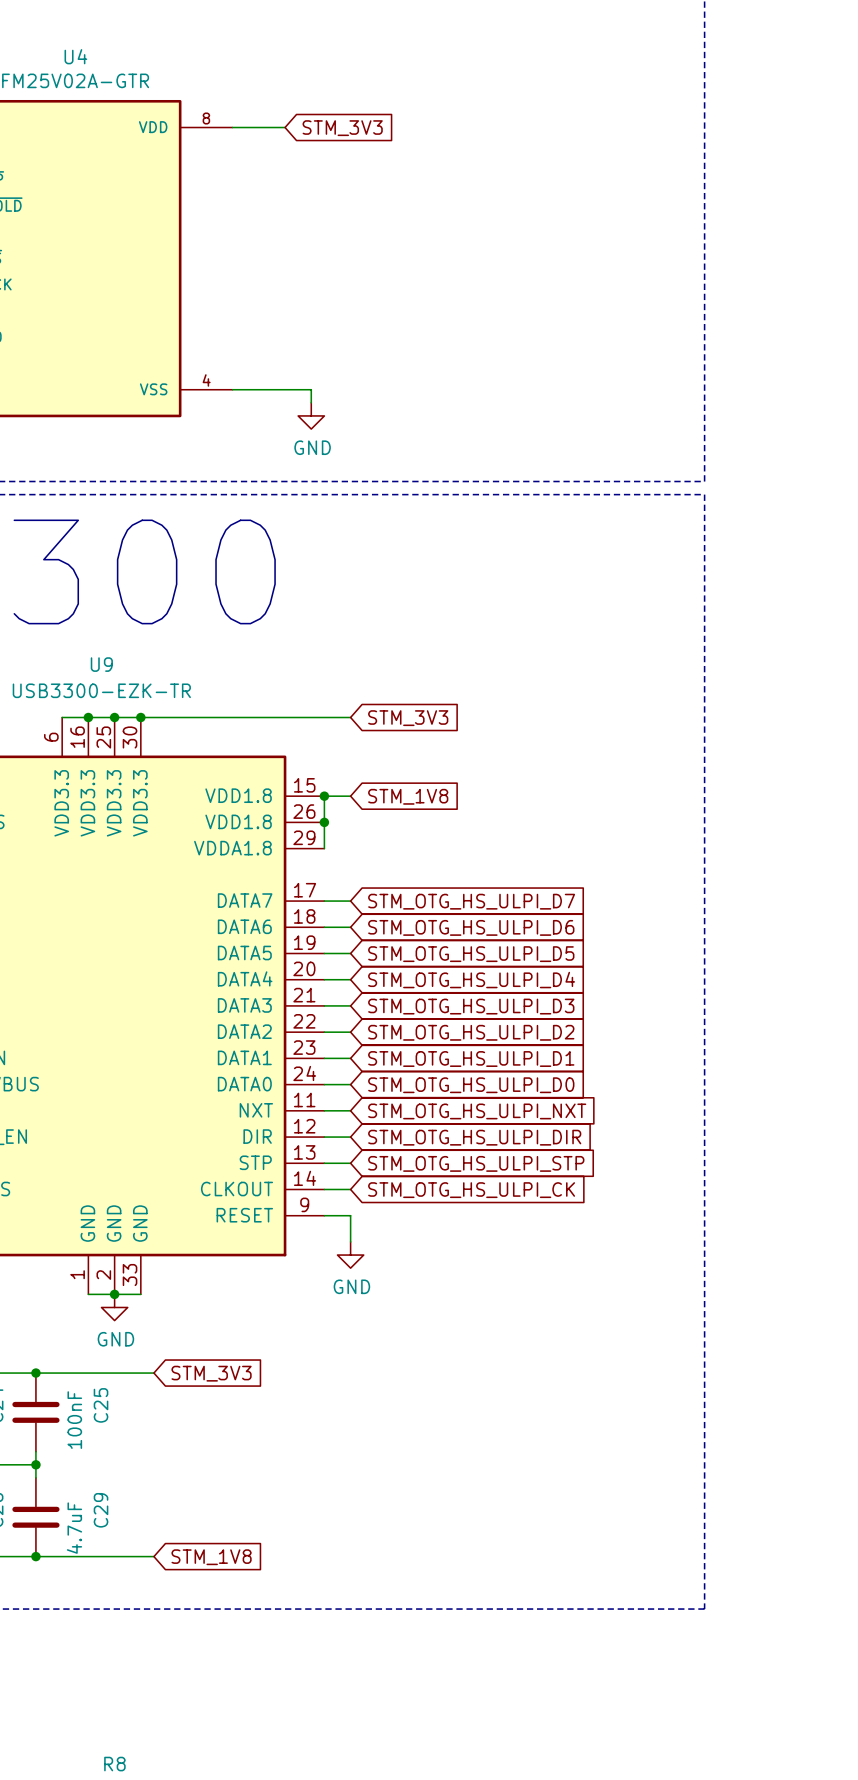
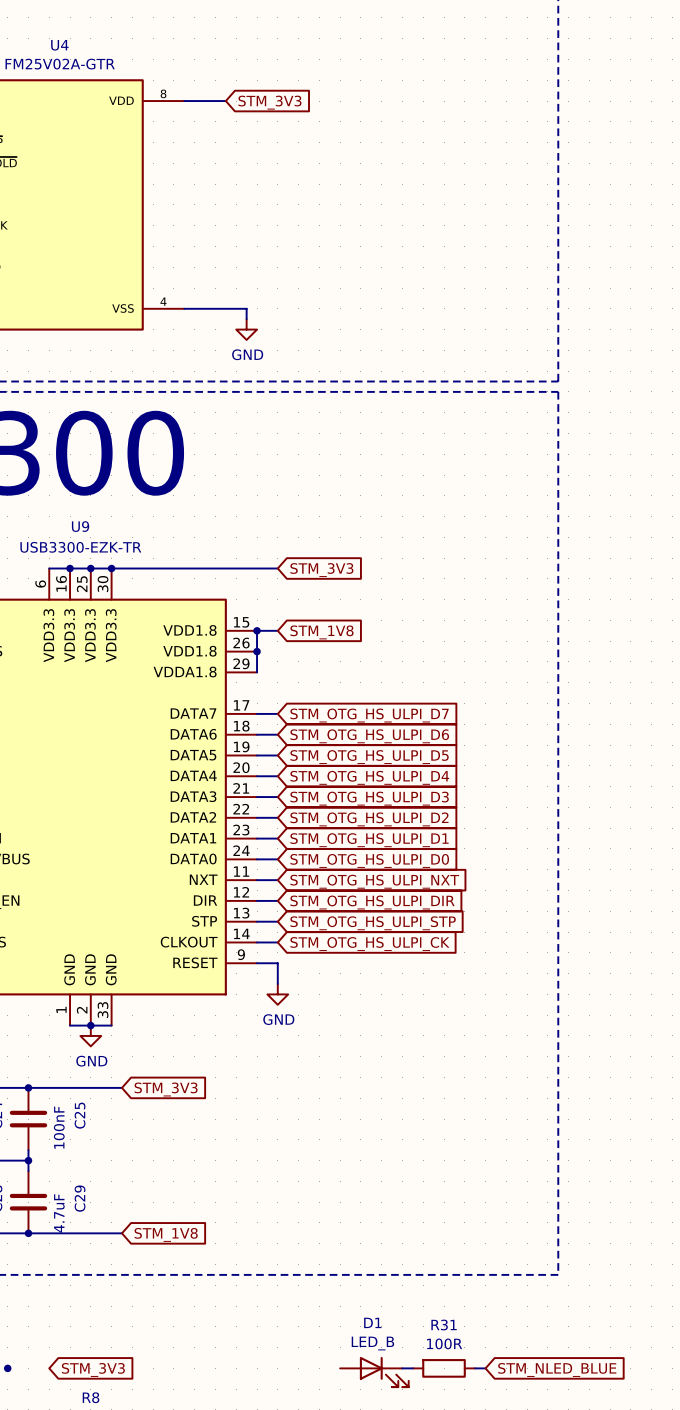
junction: none -> (7, 1368)
global label: none -> STM_3V3 (93, 1369)
wire: none -> (402, 1368) (412, 1368)
R31: none -> 100R (444, 1368)
wire: none -> (475, 1368) (485, 1368)
global label: none -> STM_NLED_BLUE (557, 1369)
D1: none -> LED_B (374, 1372)

